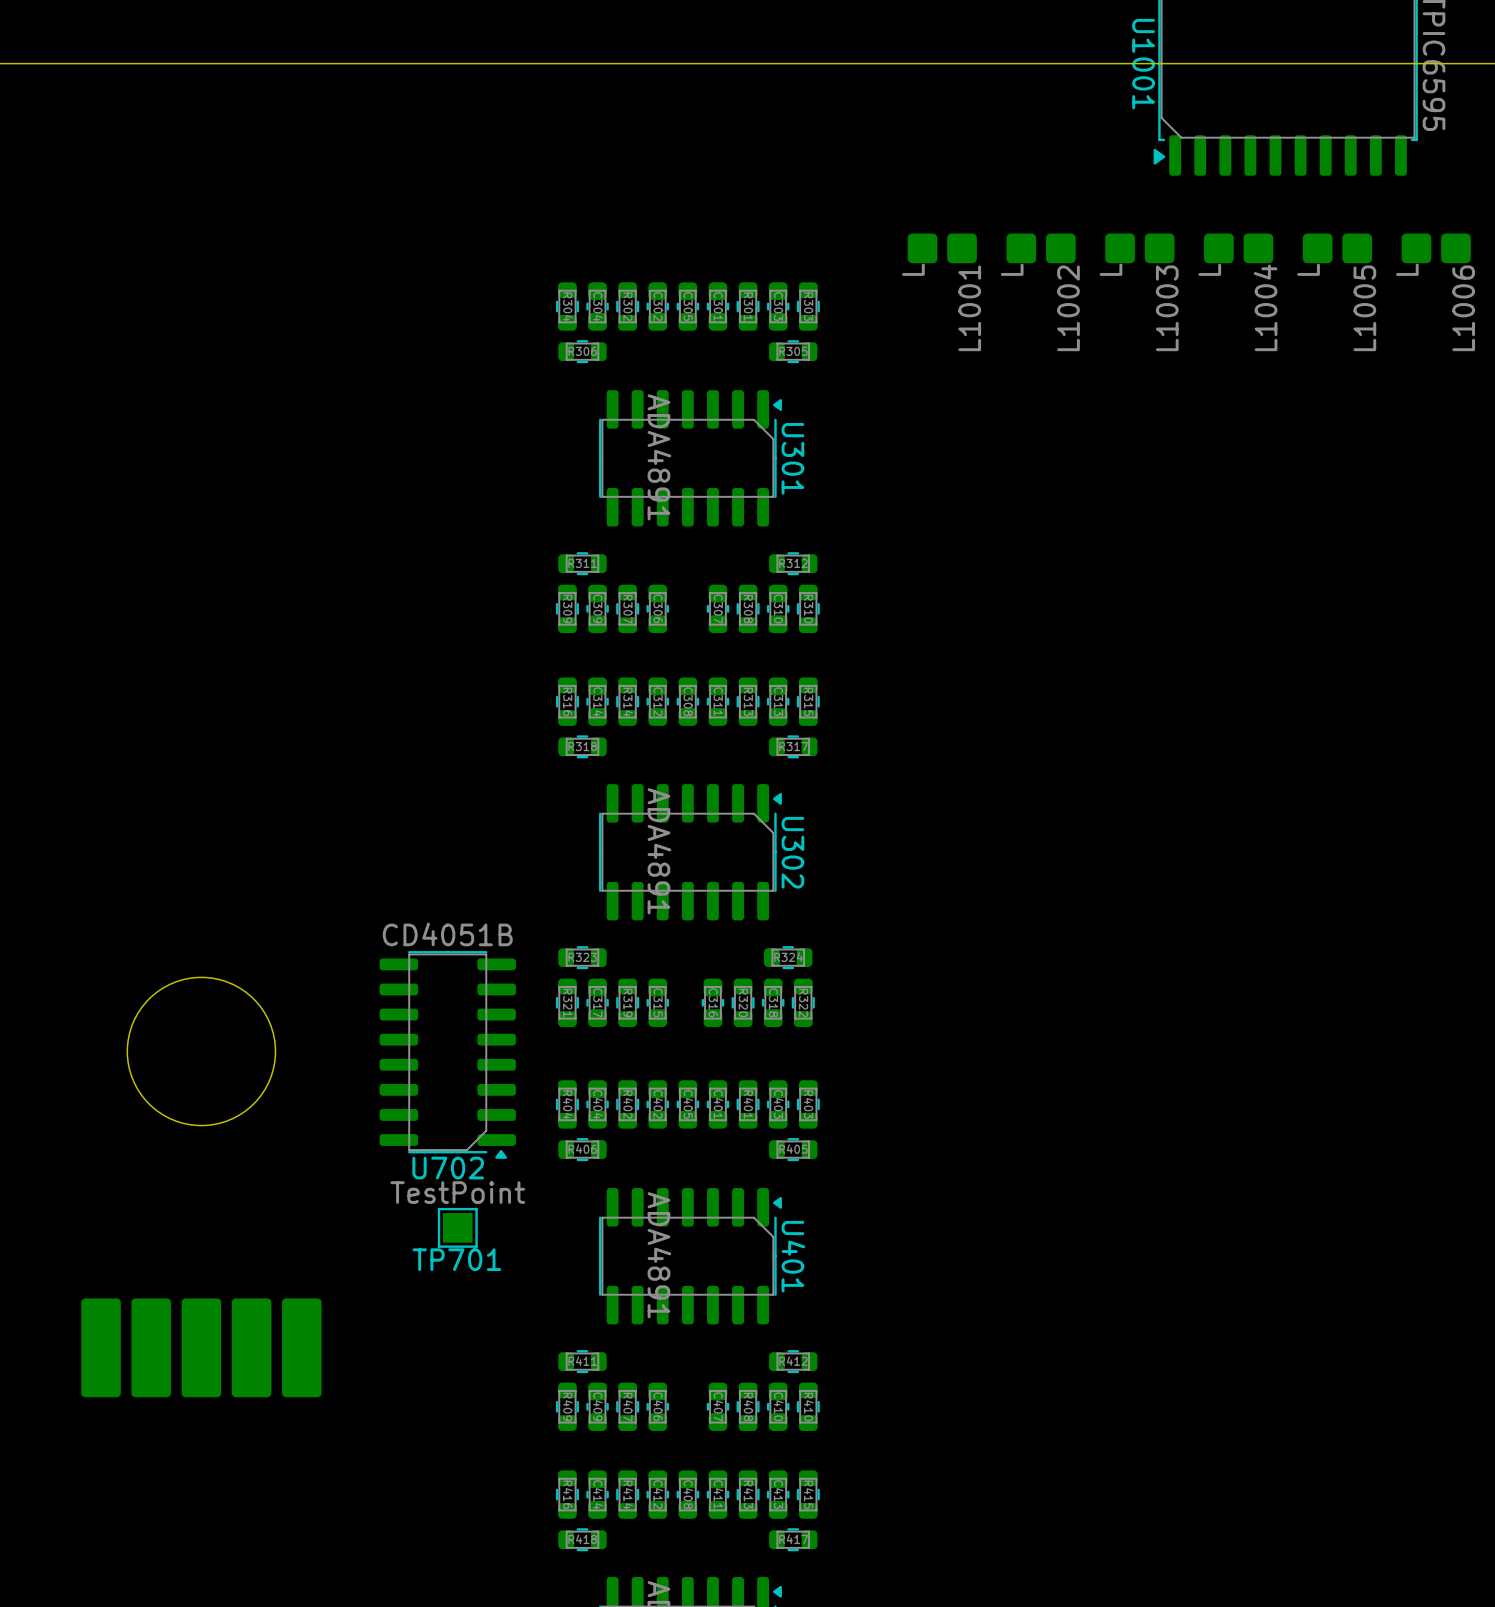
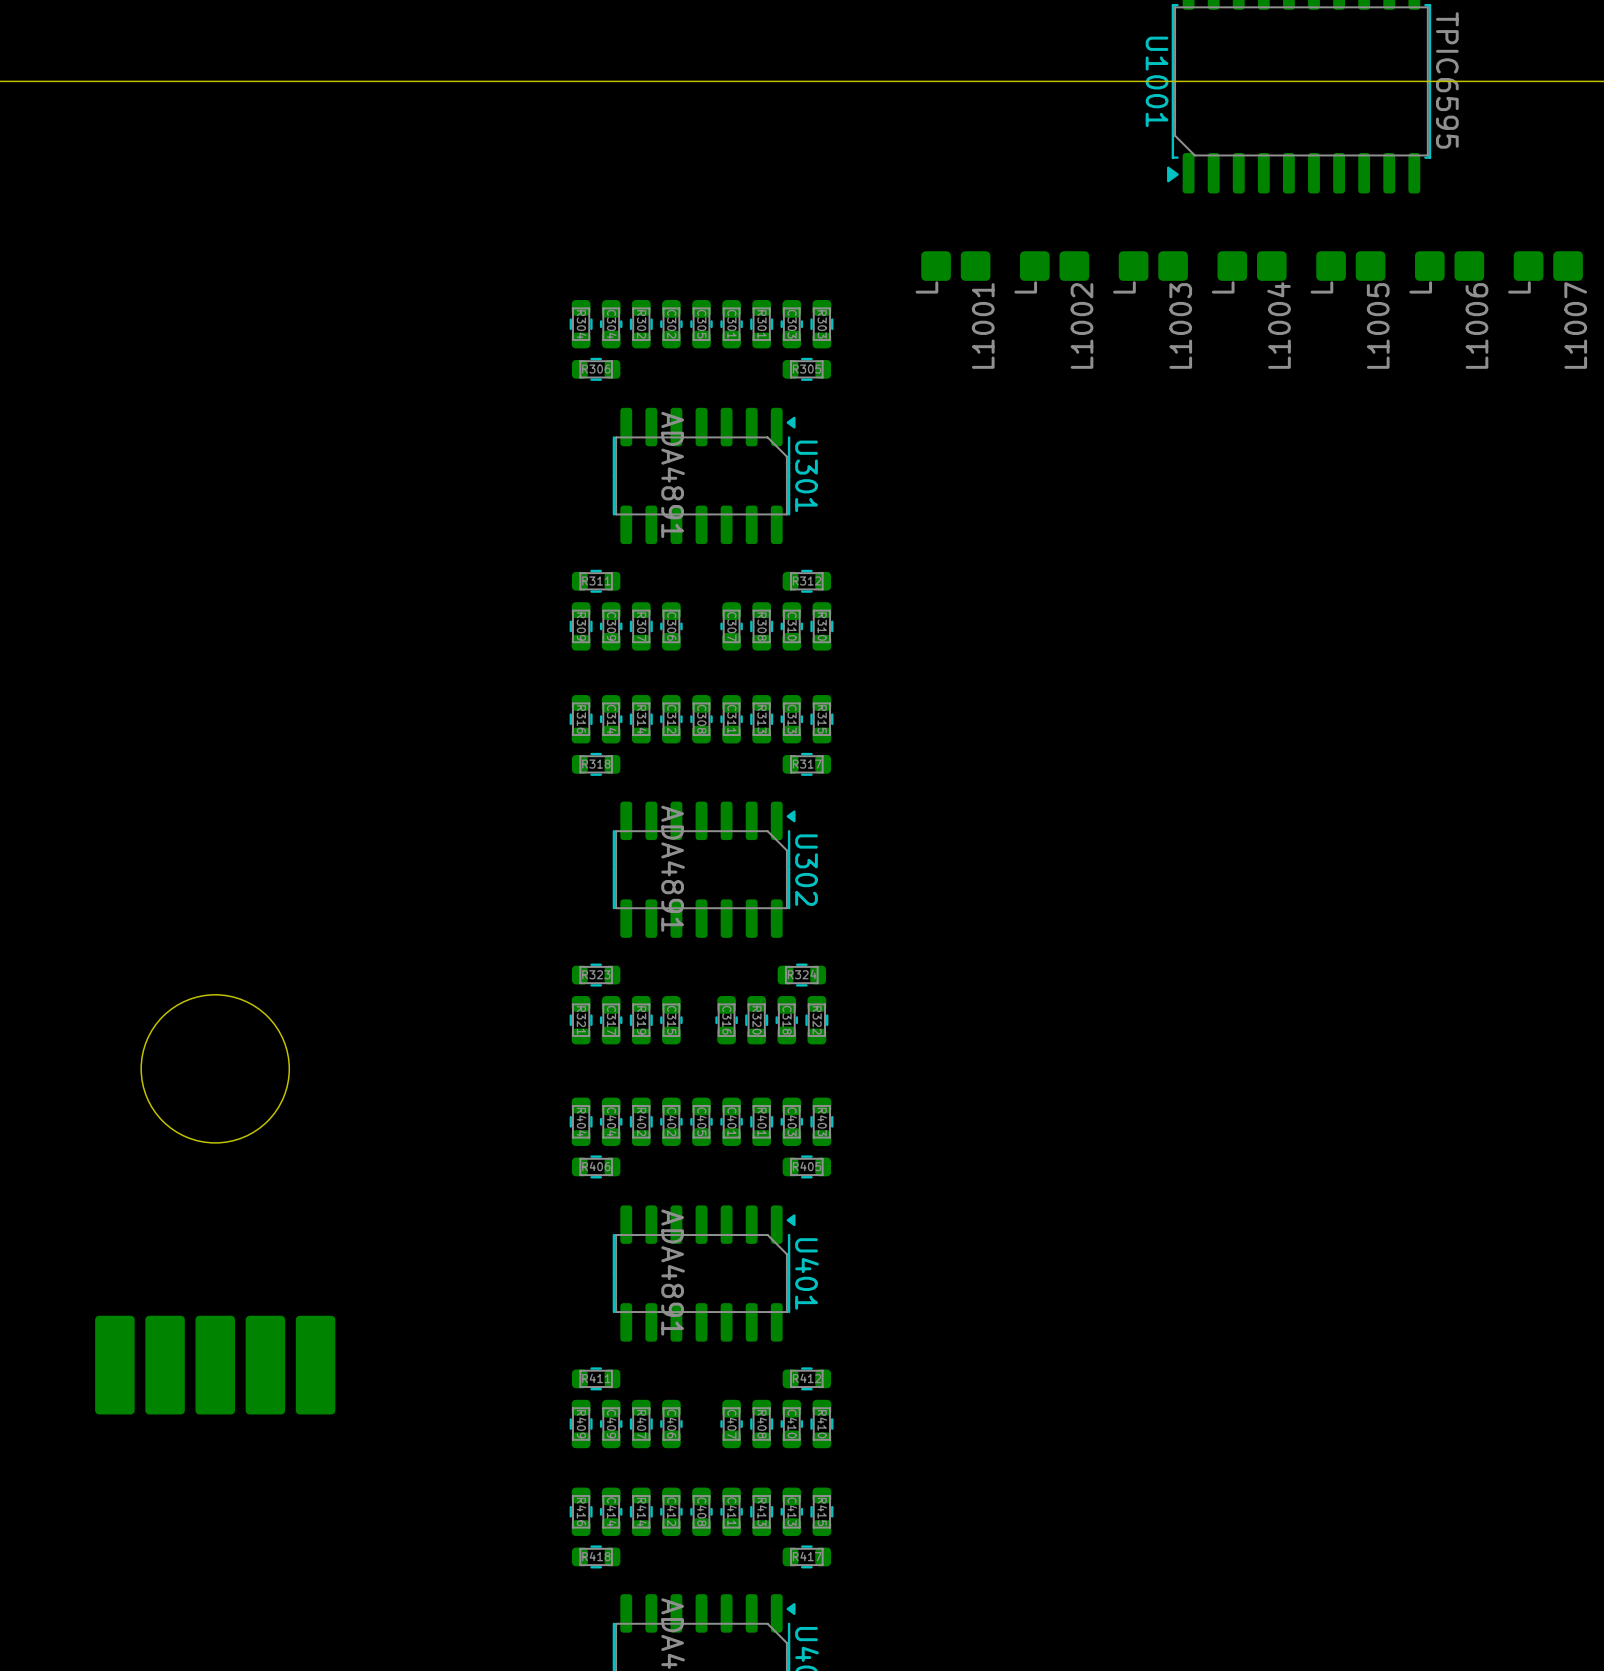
U702: CD4051B (447, 1054) -> none
TP701: TestPoint (457, 1227) -> none

